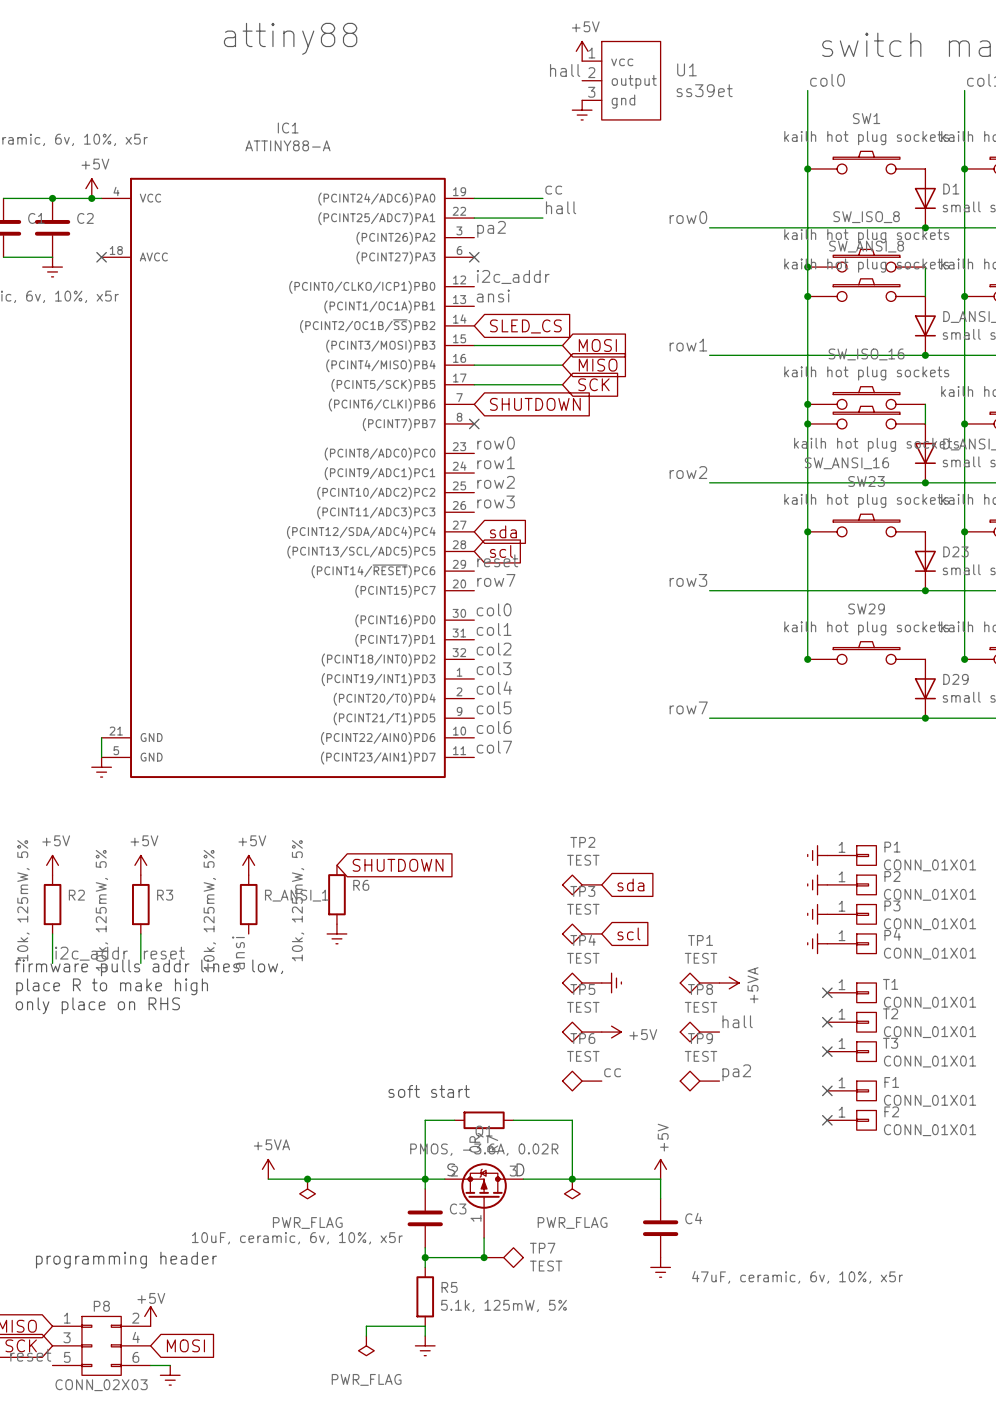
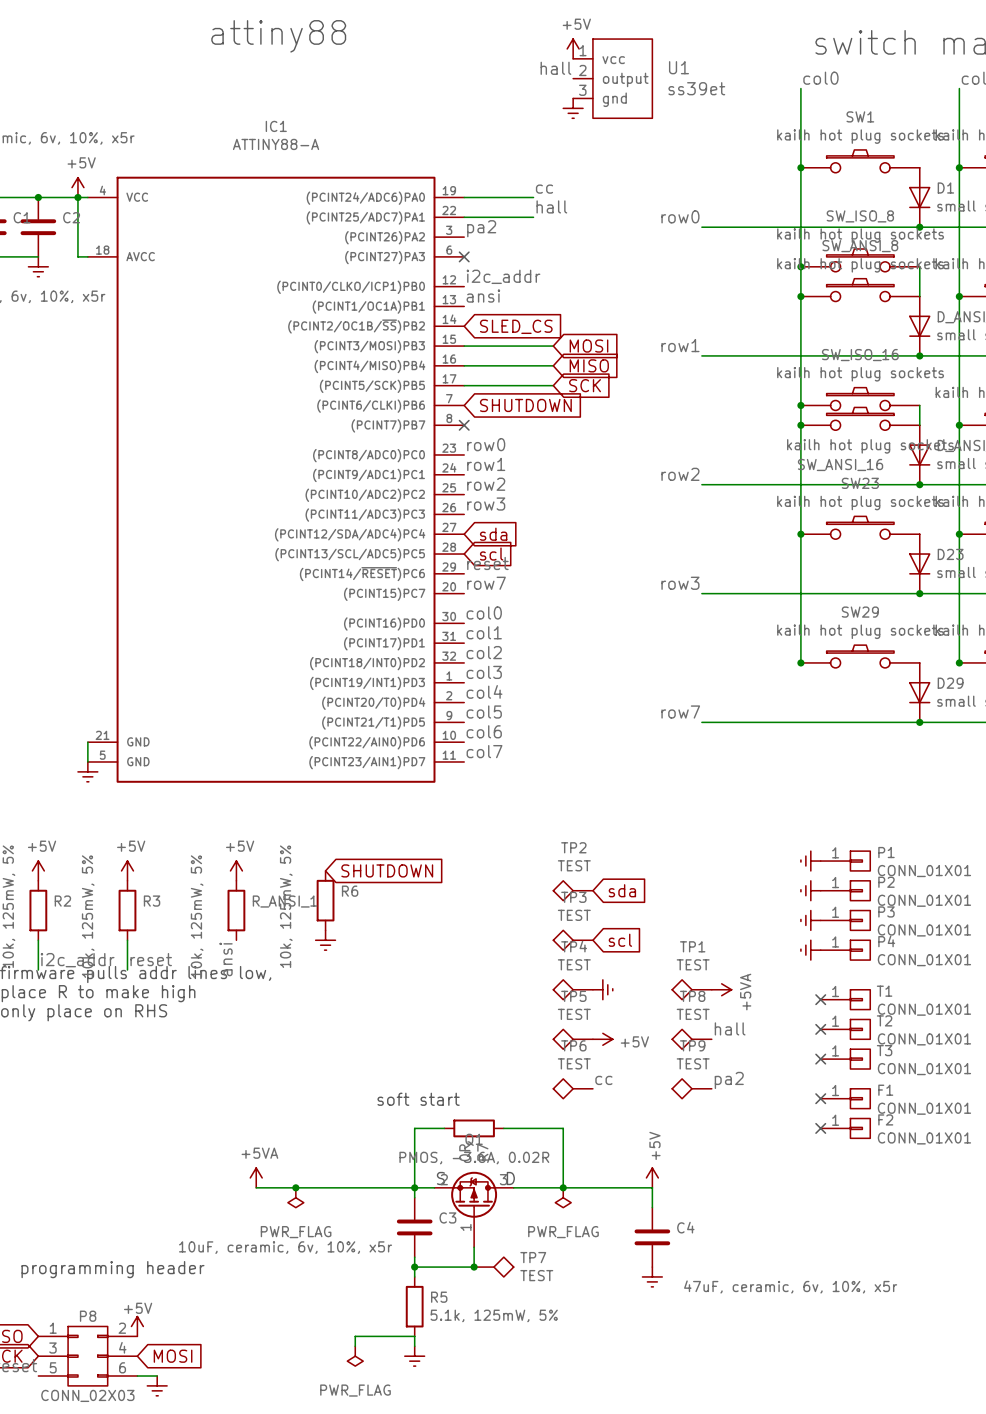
wire: none -> (77, 197) (77, 256) (87, 256)
no-connect mark: (101, 257) -> none

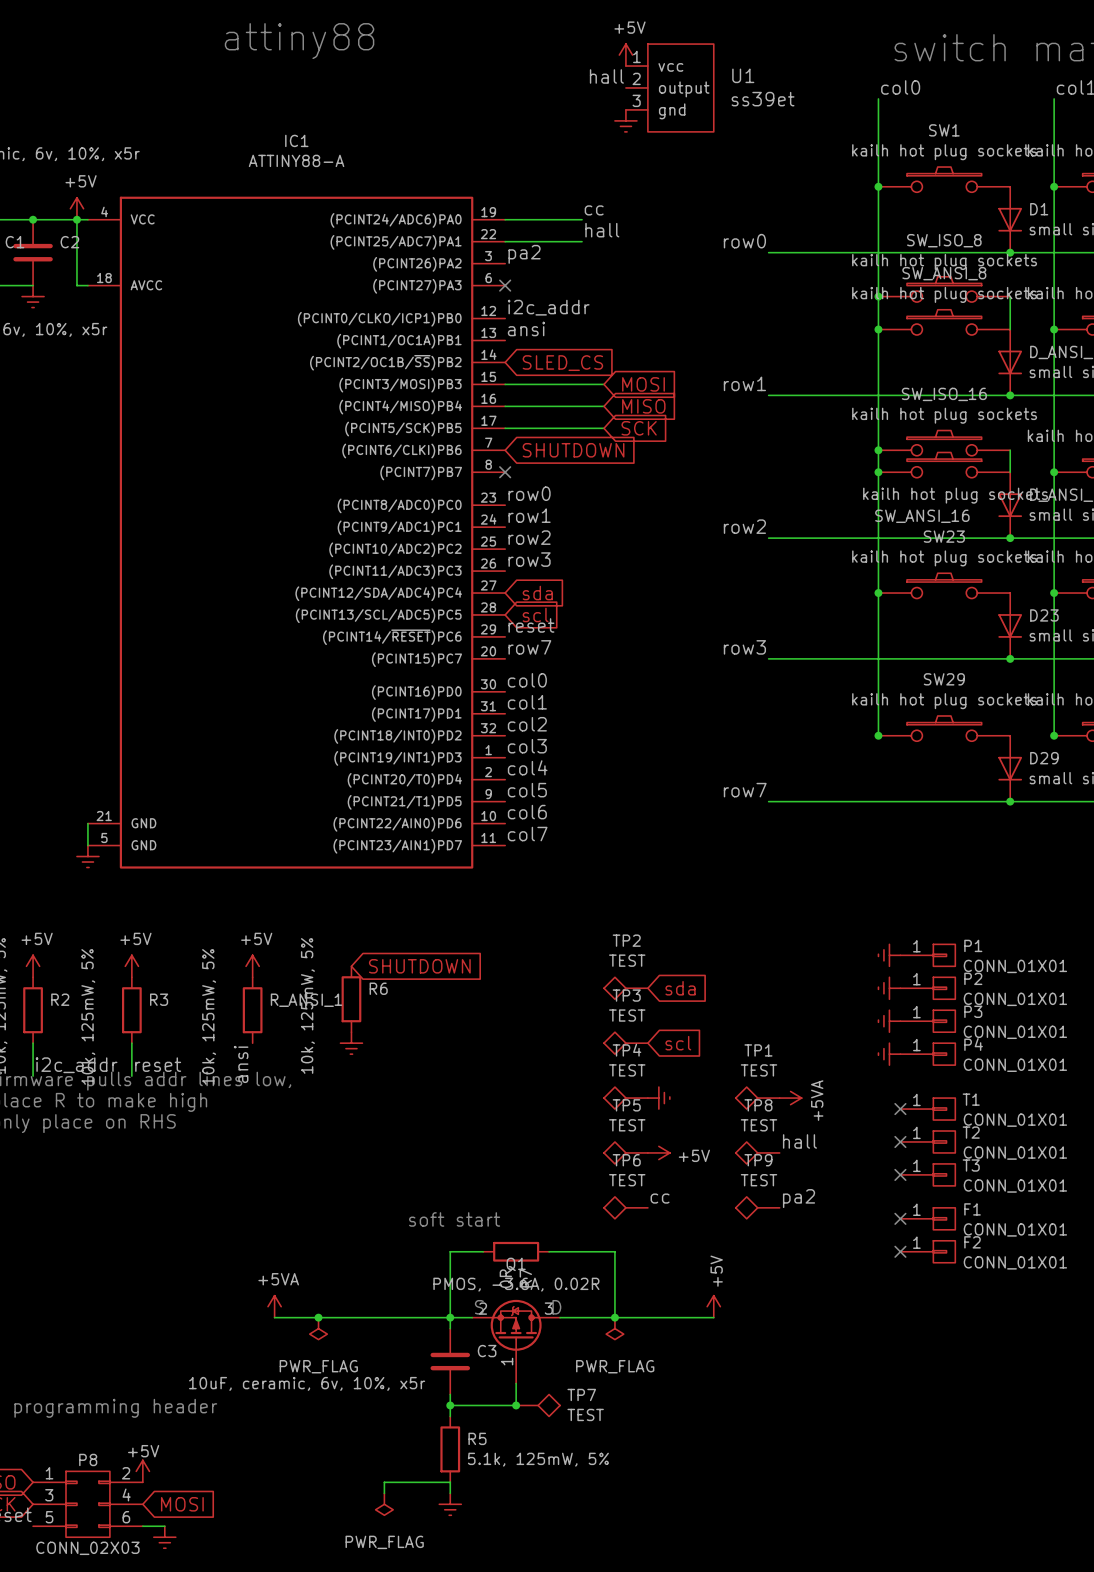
wire: (652, 1187) (652, 1207) -> none
C4: 47uF, ceramic, 6v, 10%, x5r (652, 1237) -> none
power symbol: (652, 1276) -> none

